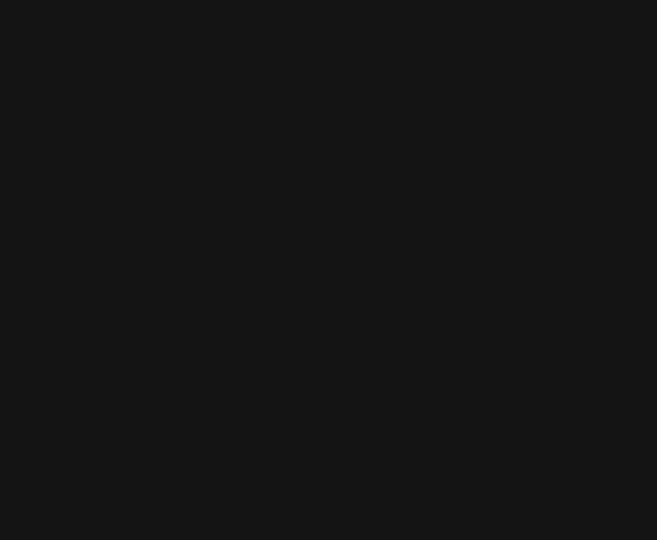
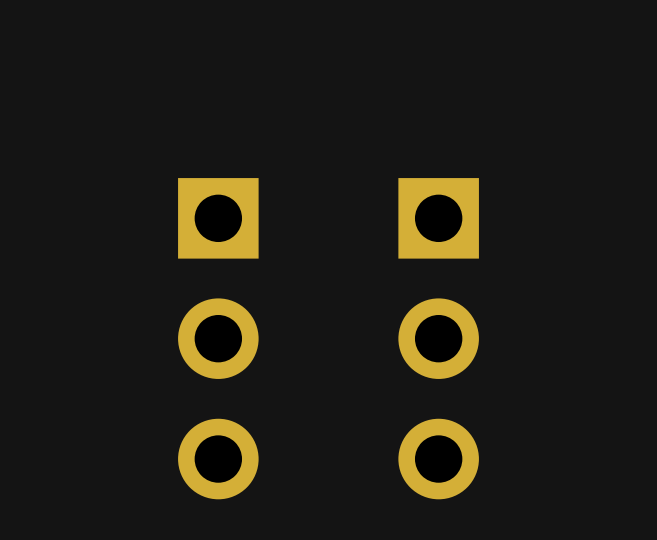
part: none -> (218, 338)
part: none -> (438, 338)

